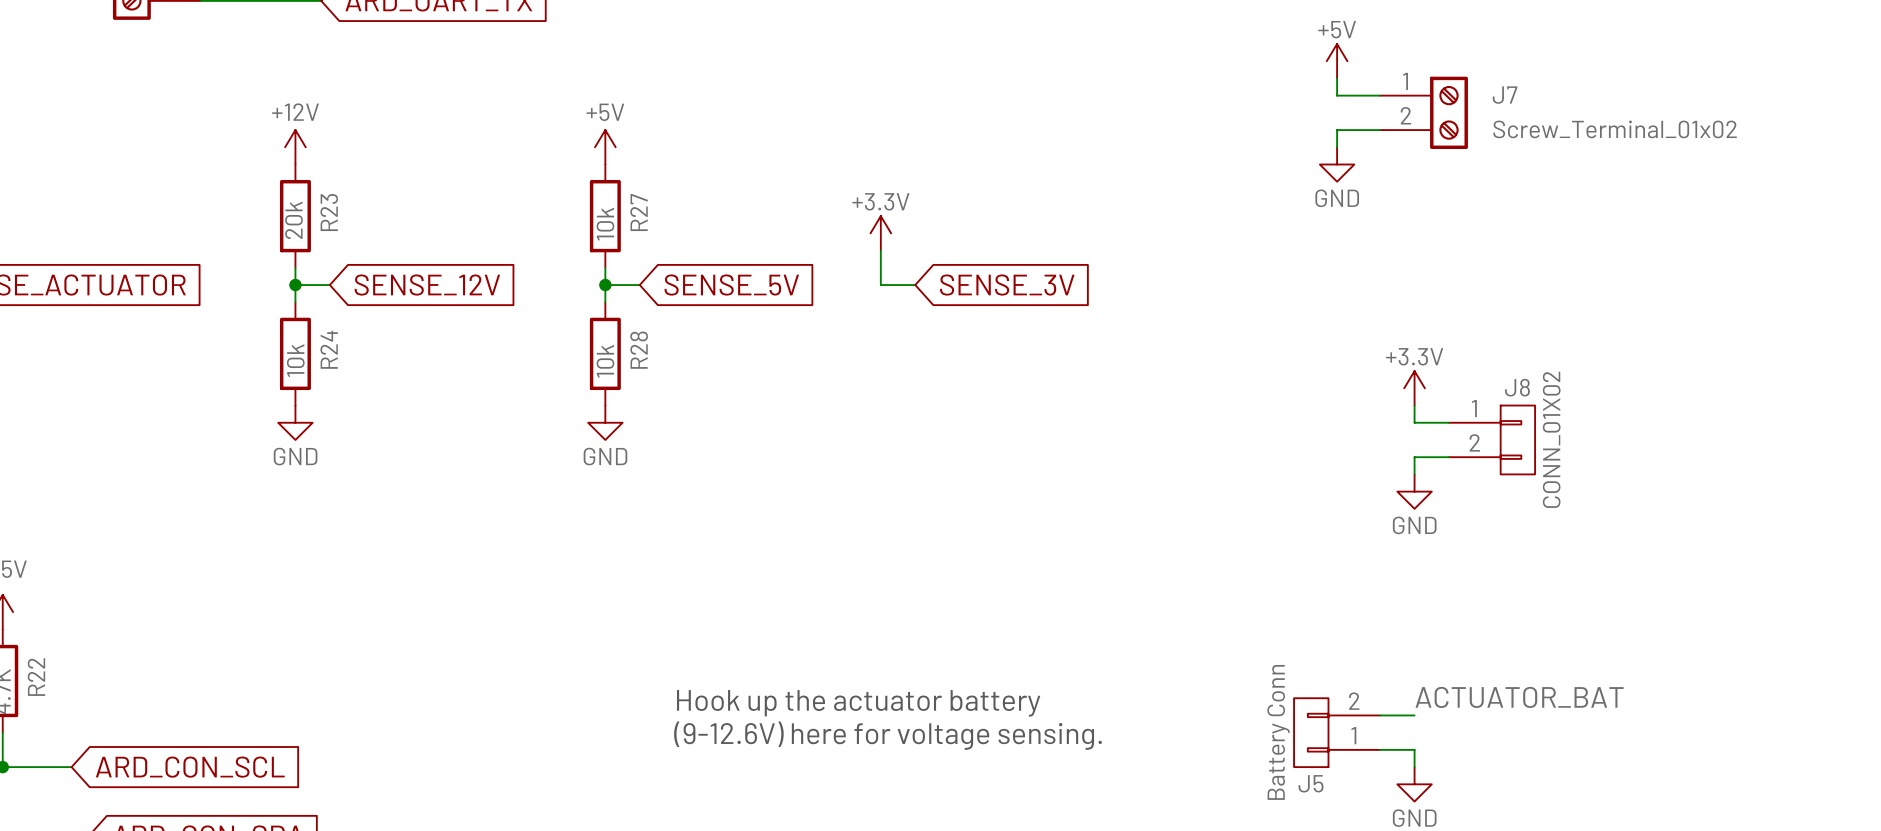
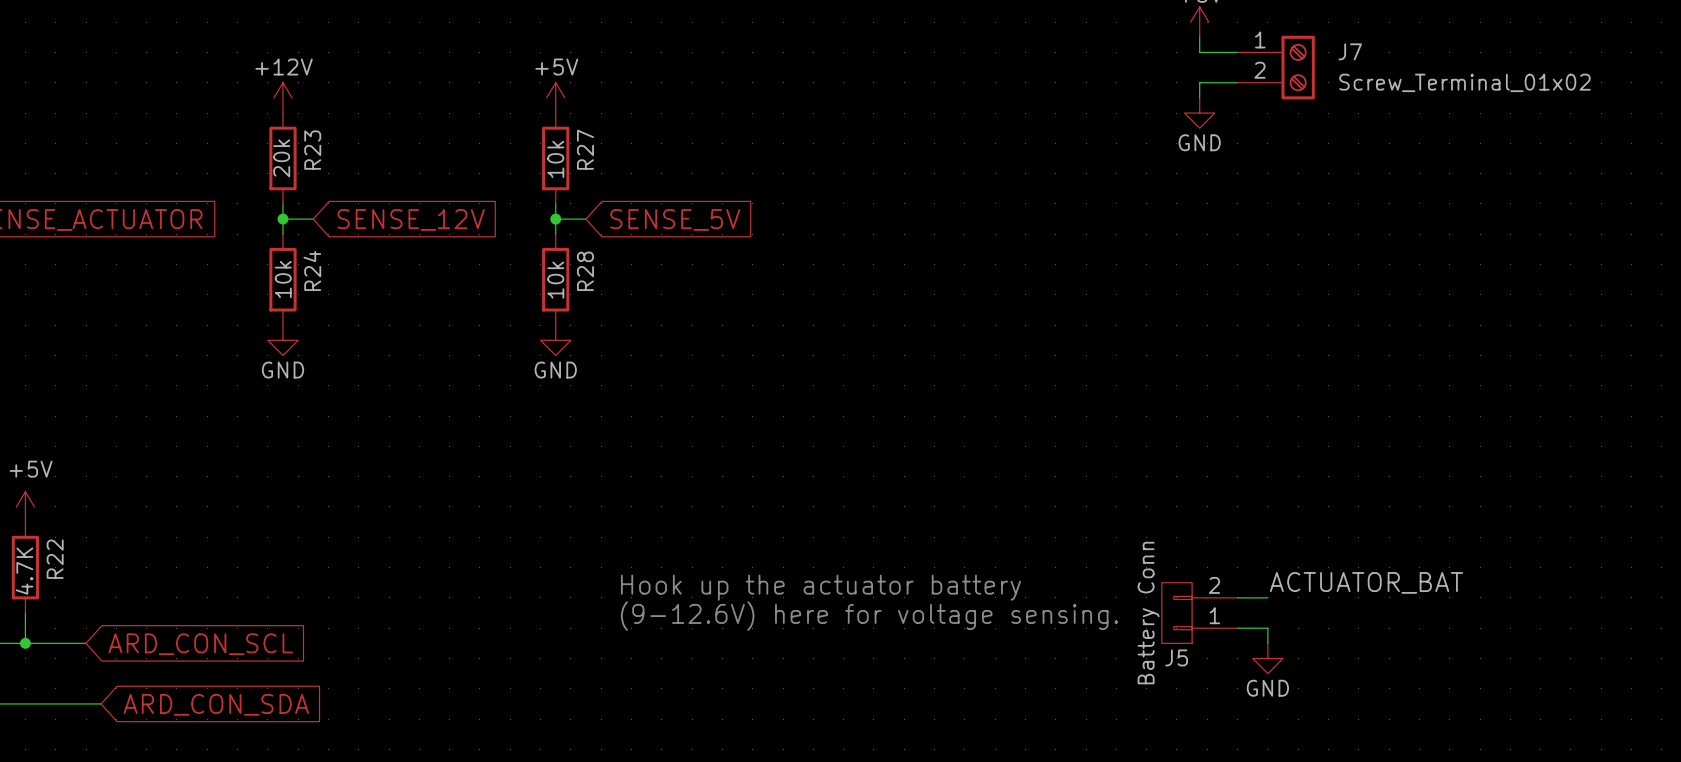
power symbol: +3.3V (880, 233) -> none
wire: (880, 250) (880, 285) (915, 285) -> none
global label: SENSE_3V (1007, 285) -> none
power symbol: +3.3V (1414, 388) -> none
wire: (1414, 405) (1414, 422) (1449, 422) -> none
J8: CONN_01X02 (1492, 439) -> none
wire: (1449, 457) (1414, 457) (1414, 474) -> none
power symbol: GND (1414, 491) -> none

